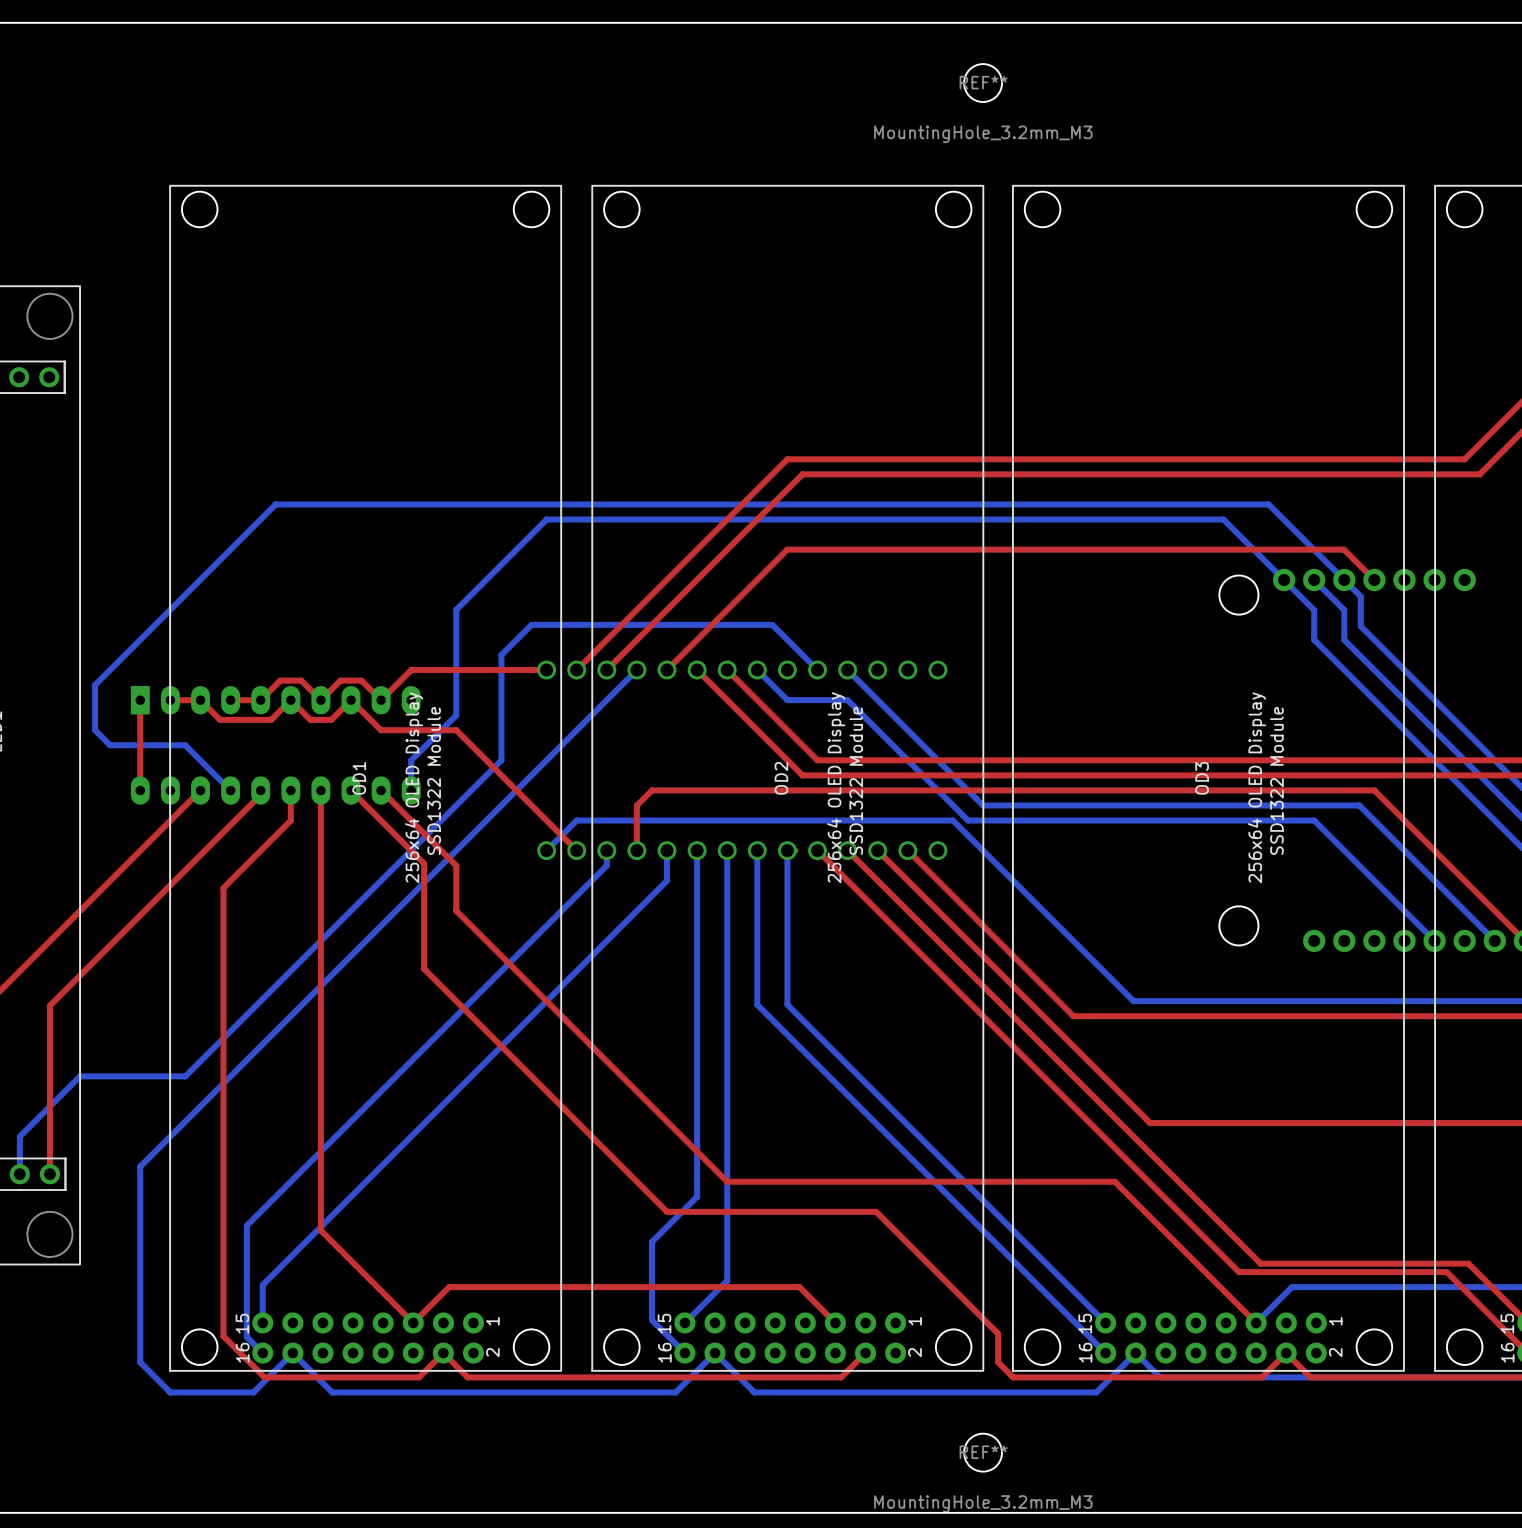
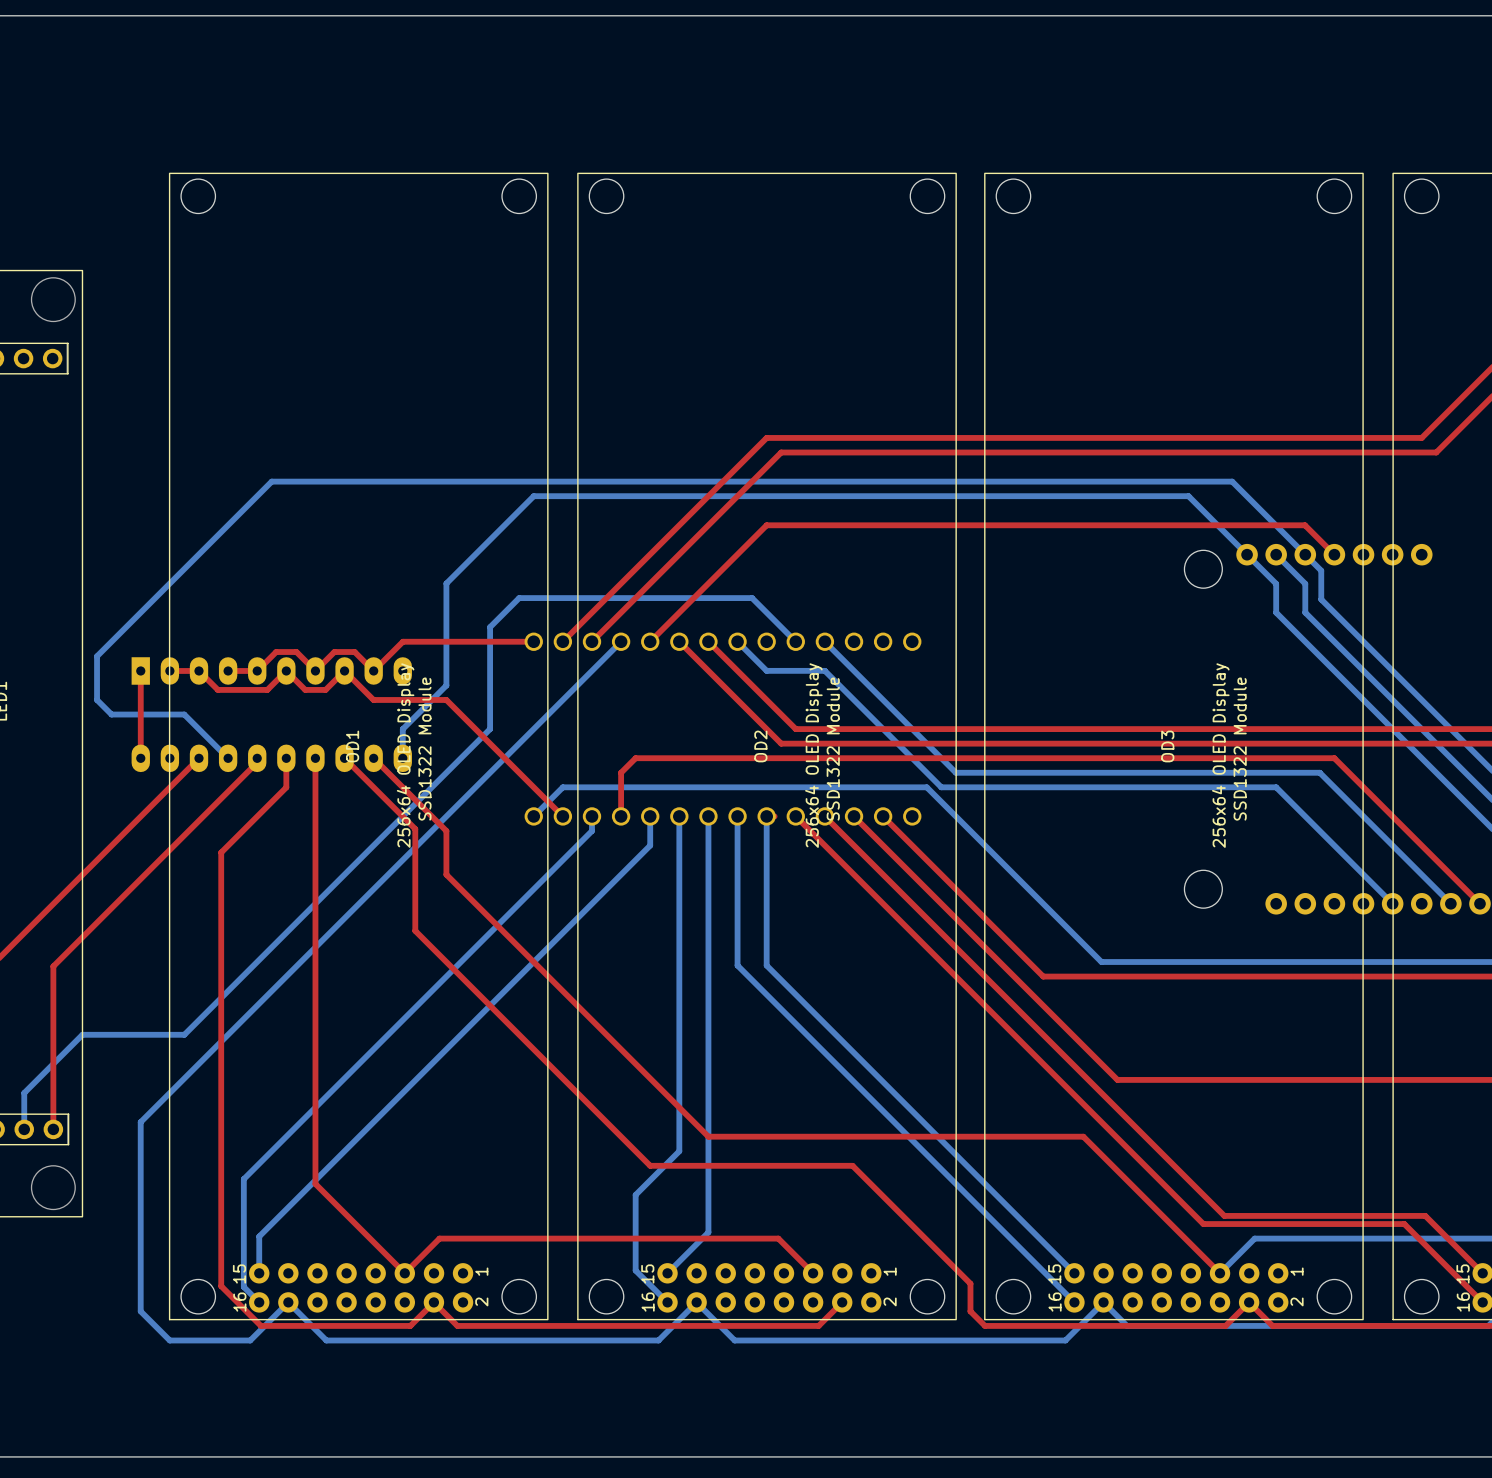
REF**: MountingHole_3.2mm_M3 (983, 83) -> none
REF**: MountingHole_3.2mm_M3 (983, 1452) -> none

